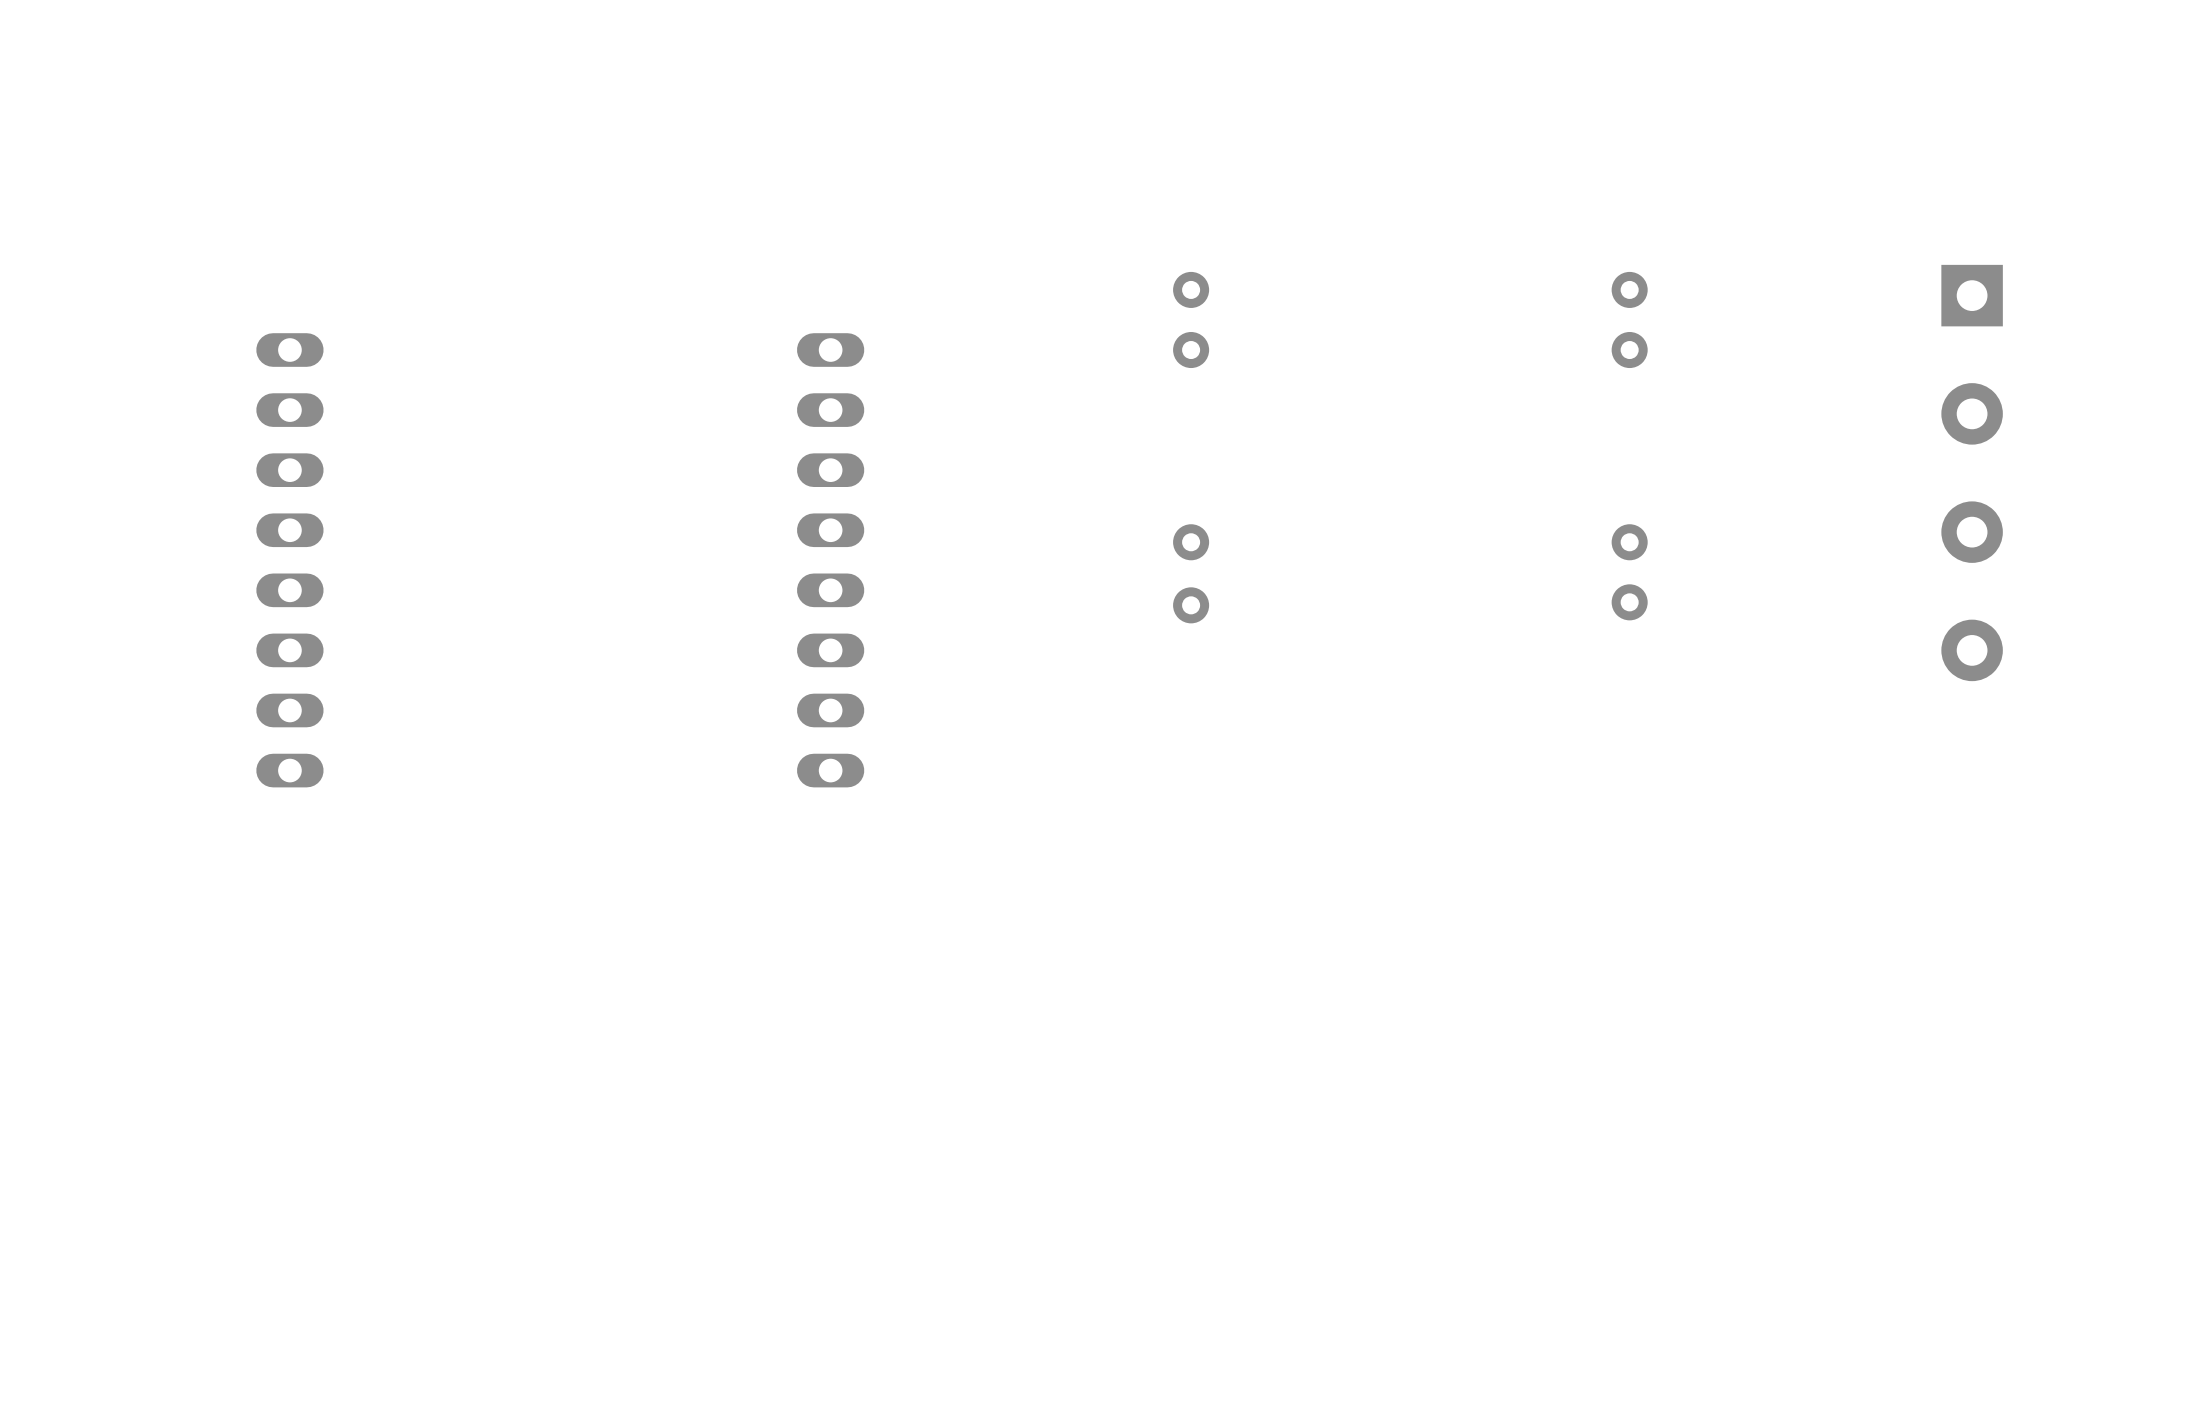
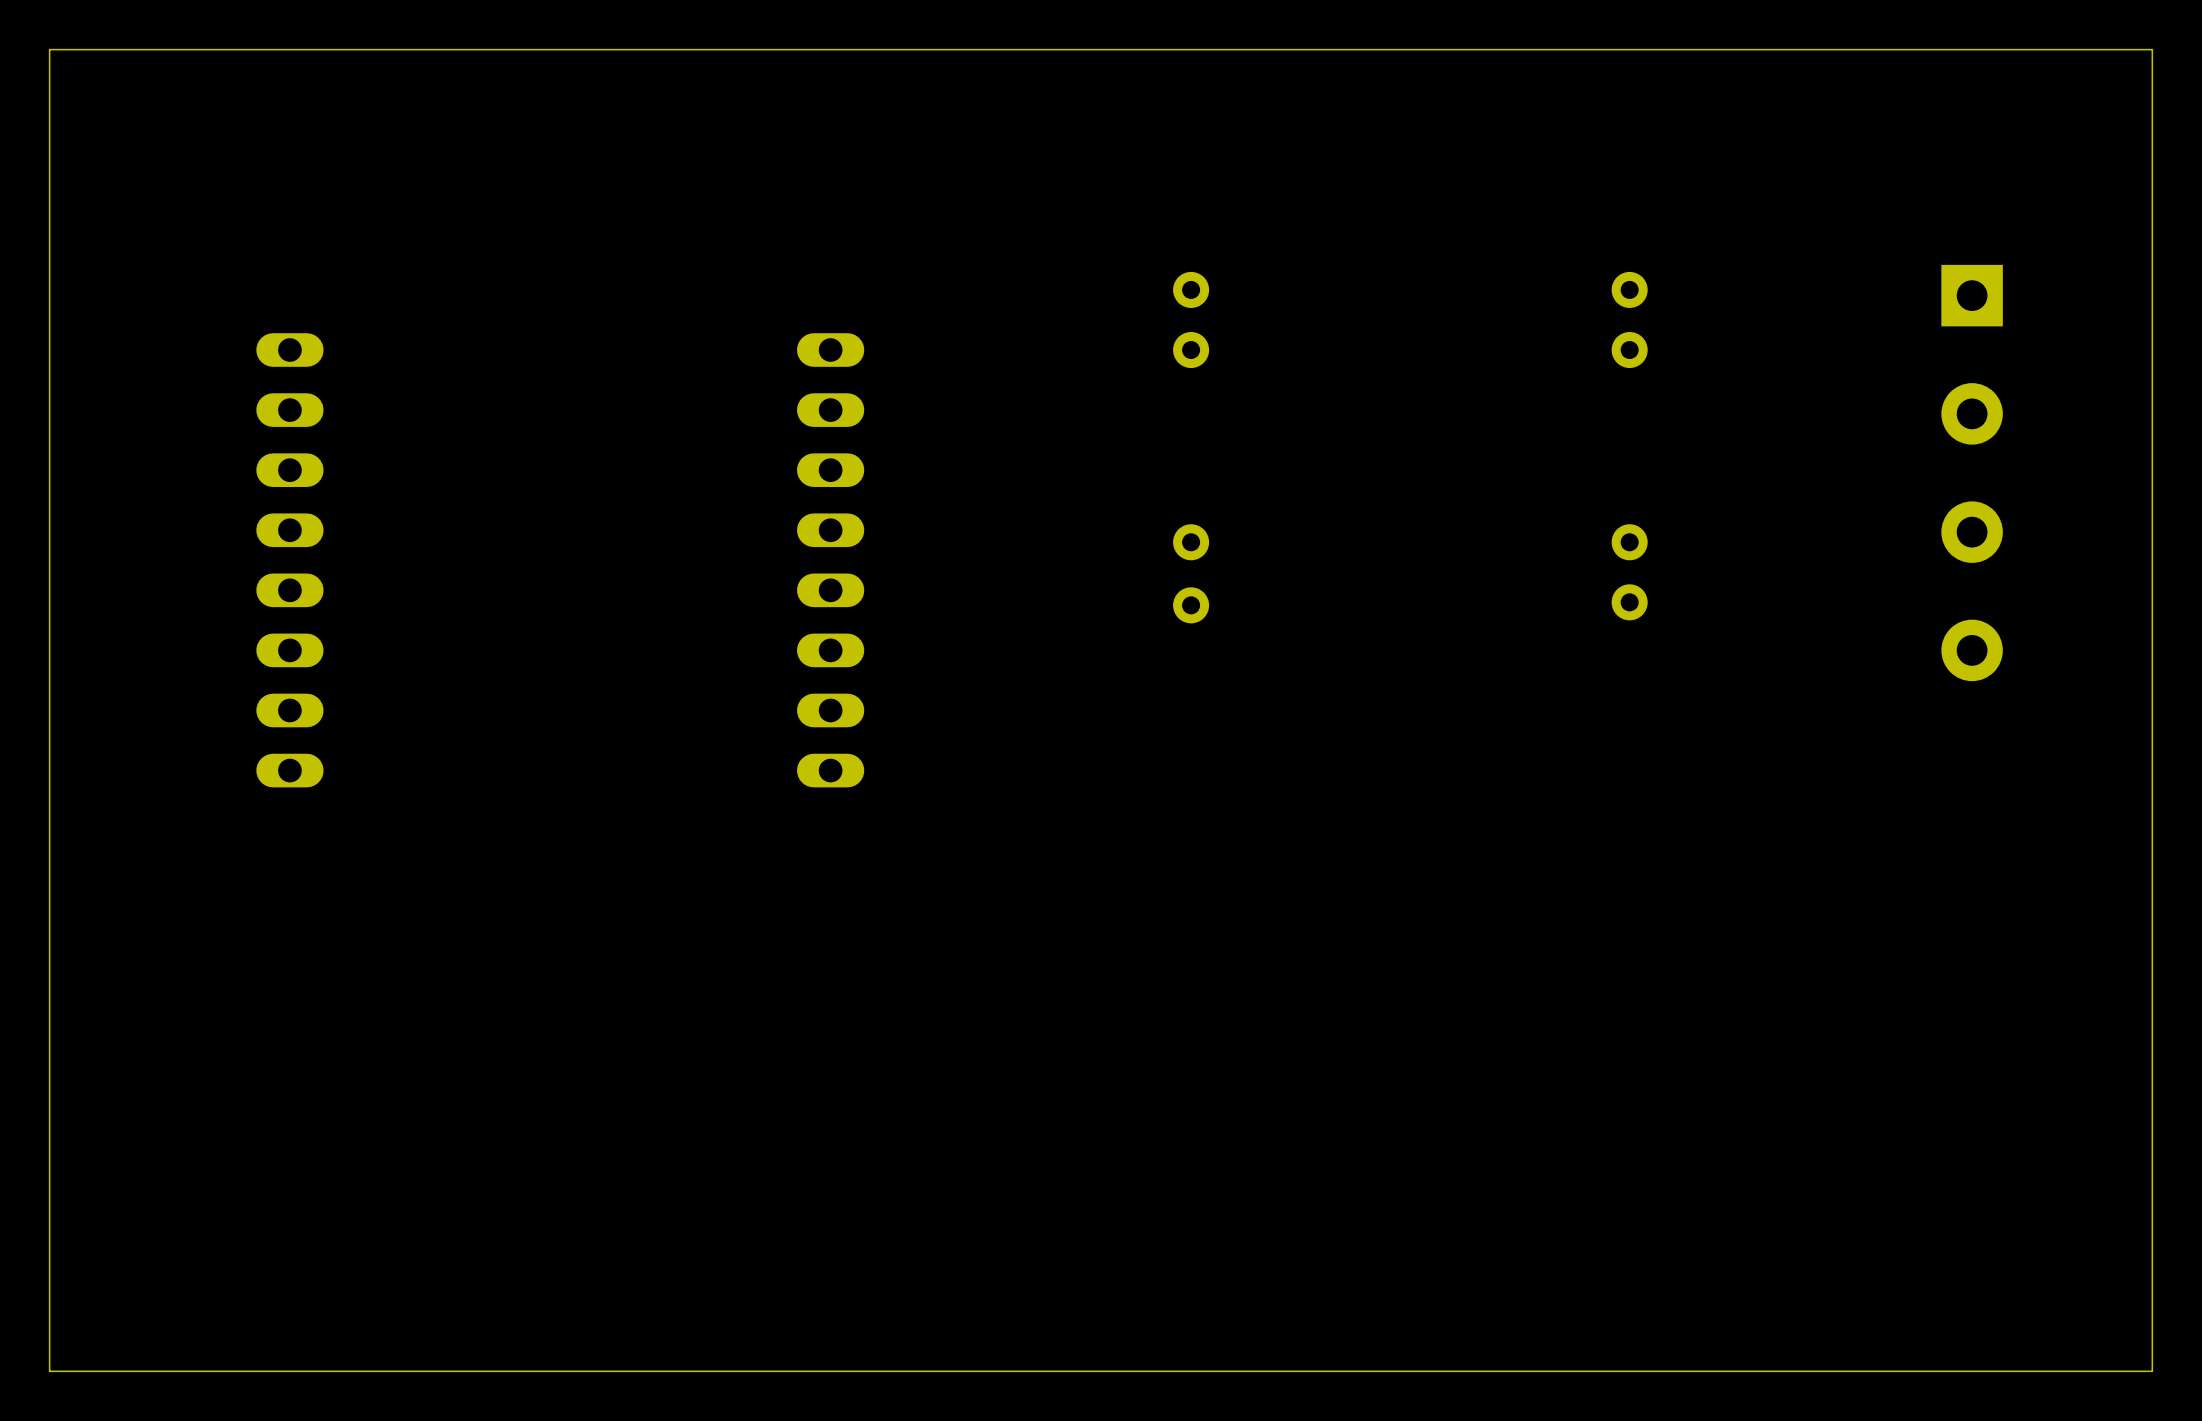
board edge: none -> (2152, 49) (49, 49) (49, 1371) (2152, 1371) (2152, 49)

